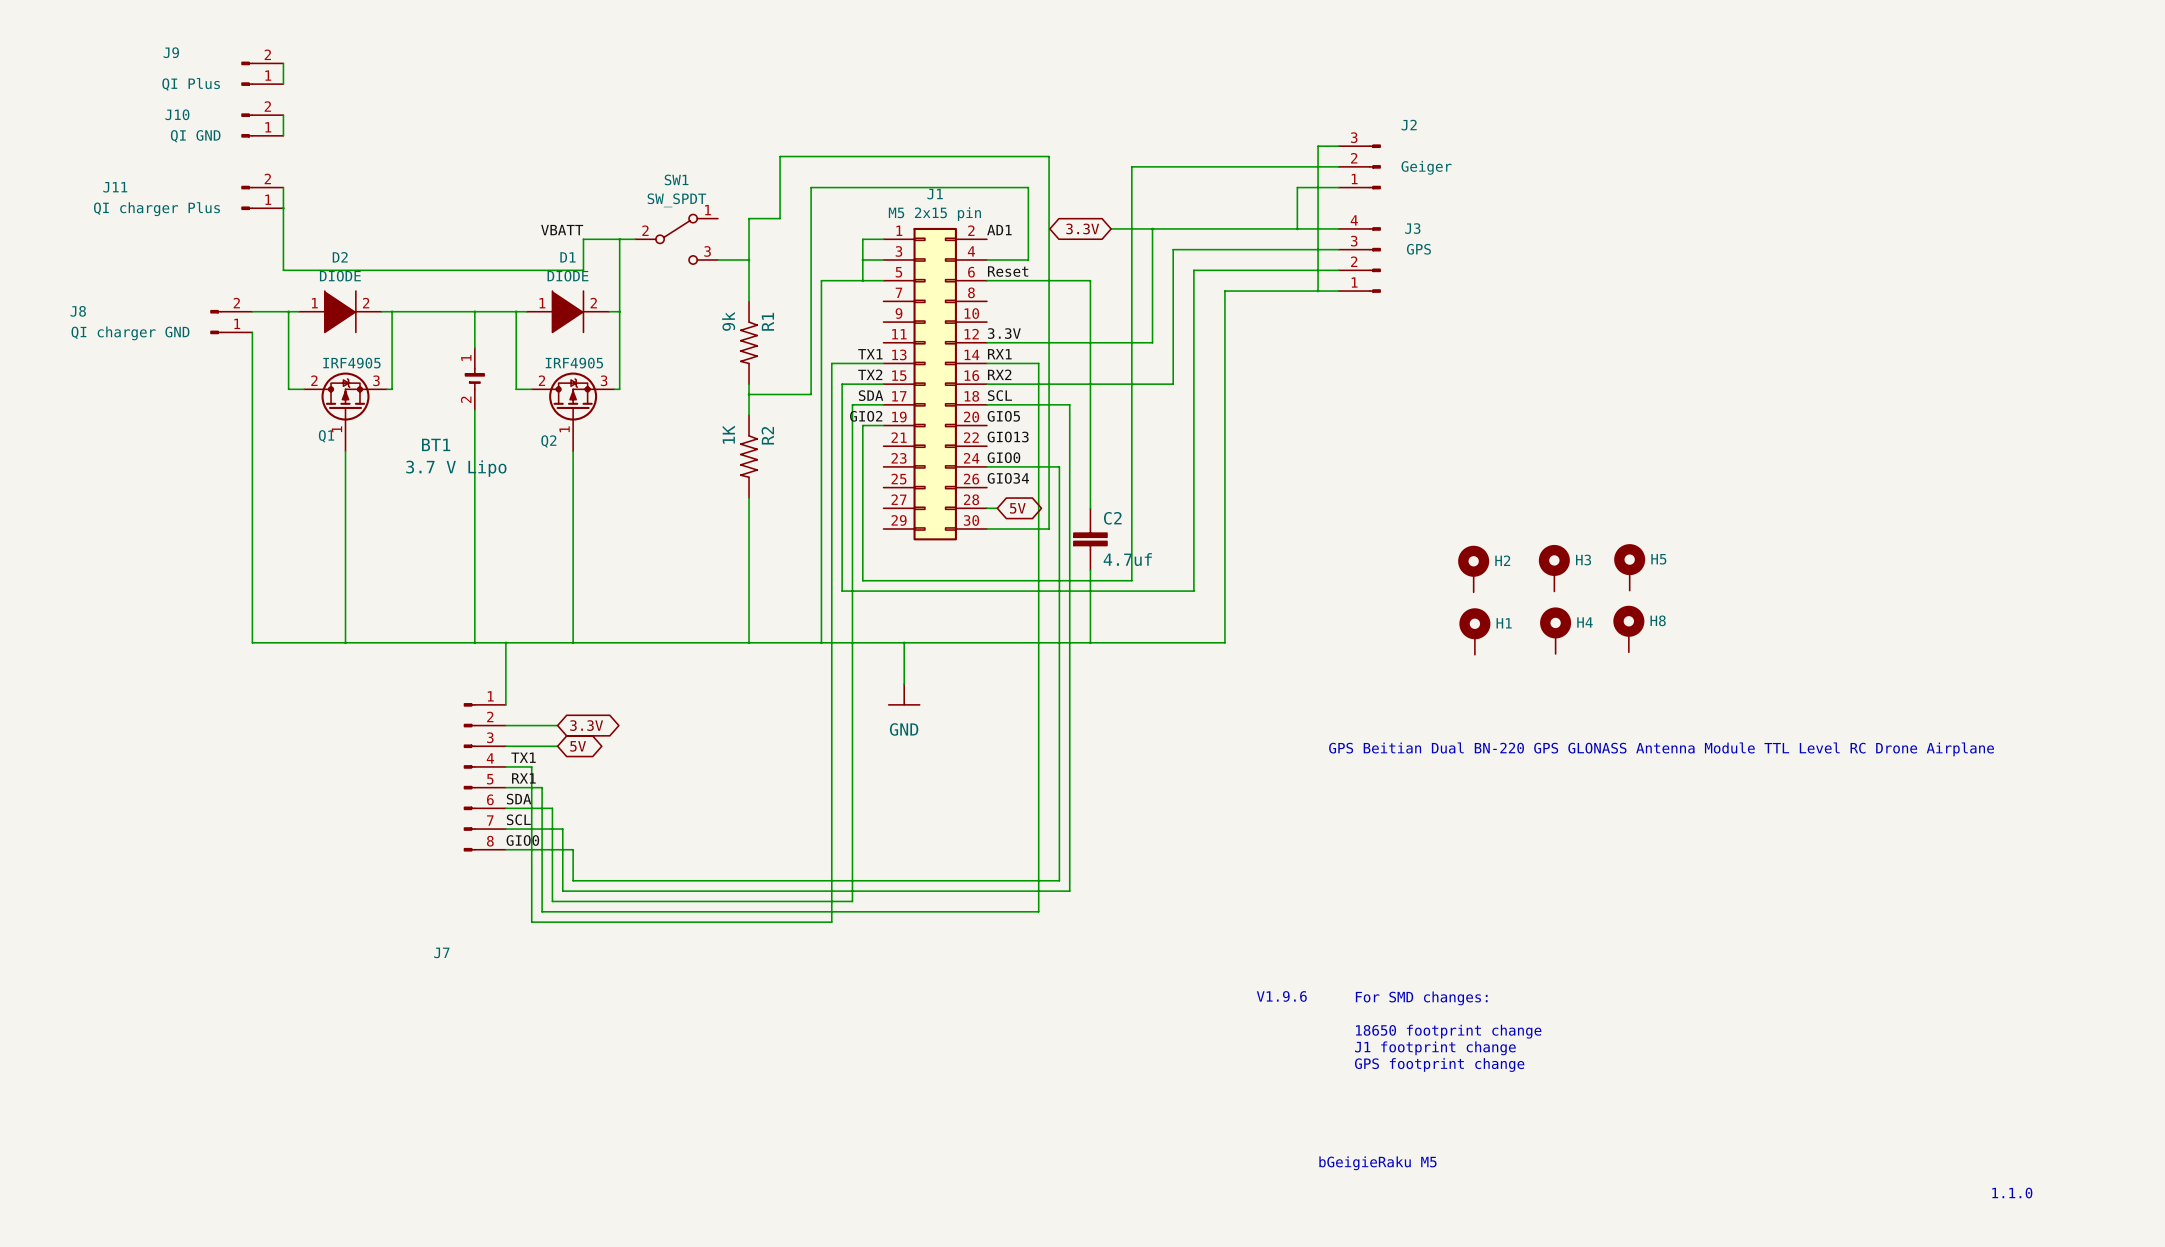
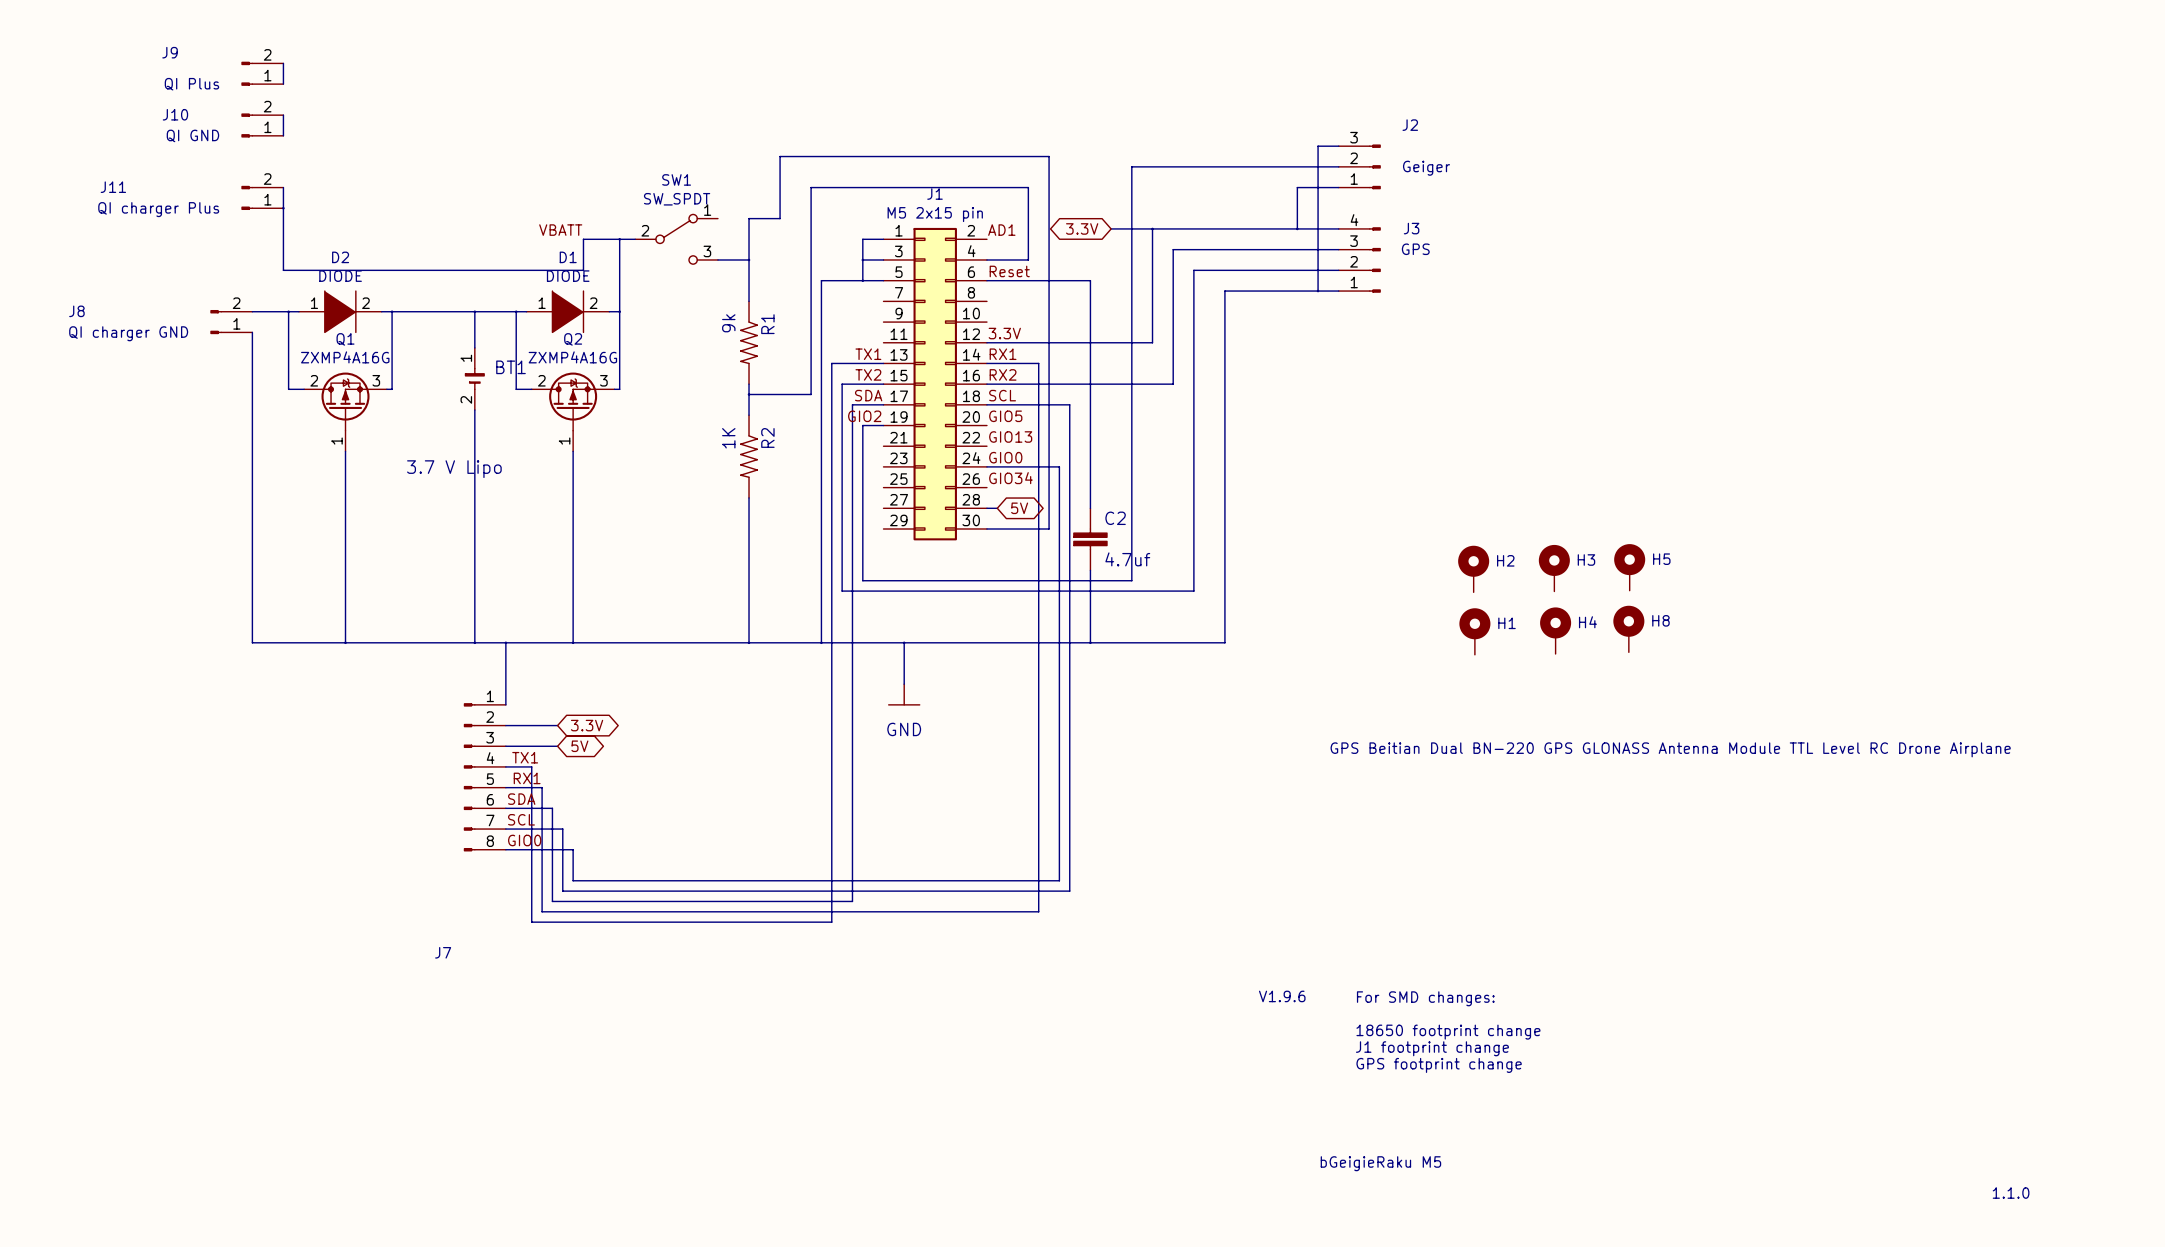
Q1 value: IRF4905 (351, 363) -> ZXMP4A16G (345, 357)
Q2 value: IRF4905 (574, 363) -> ZXMP4A16G (572, 357)
Q1 symbol: [304, 372, 387, 452] -> [304, 372, 387, 452]
Q2 symbol: [531, 372, 615, 452] -> [531, 372, 615, 452]
Q1 name position: Q1 (326, 436) -> Q1 (345, 339)
Q2 name position: Q2 (548, 441) -> Q2 (573, 339)
BT1 name position: BT1 (436, 444) -> BT1 (511, 367)

